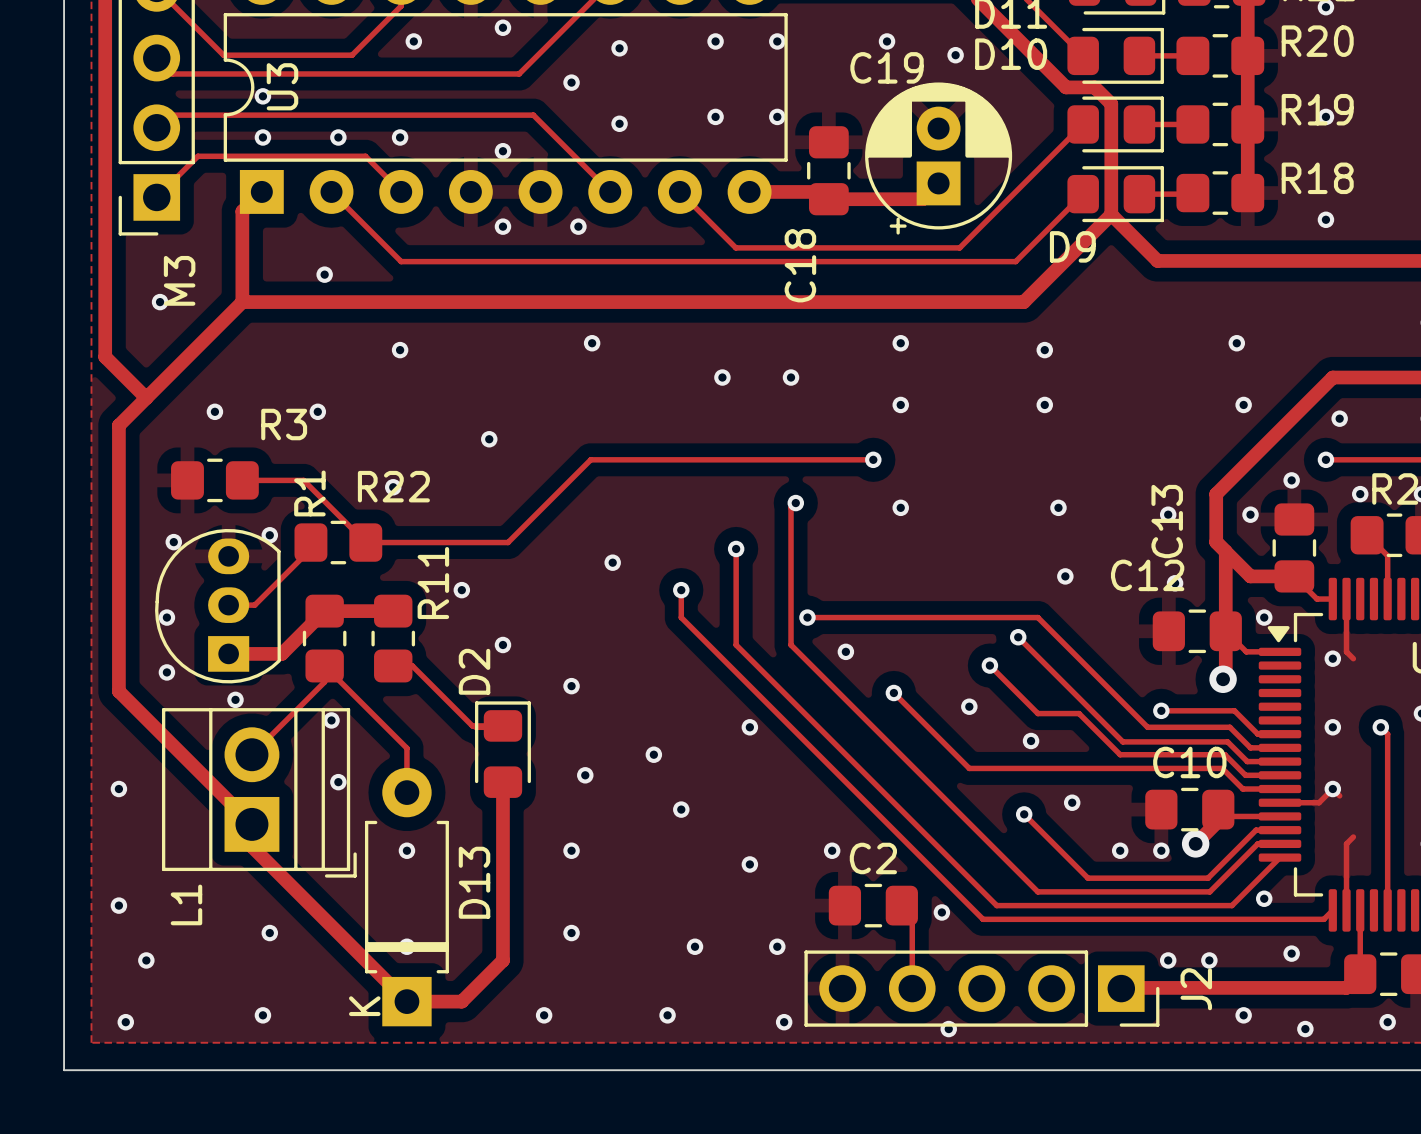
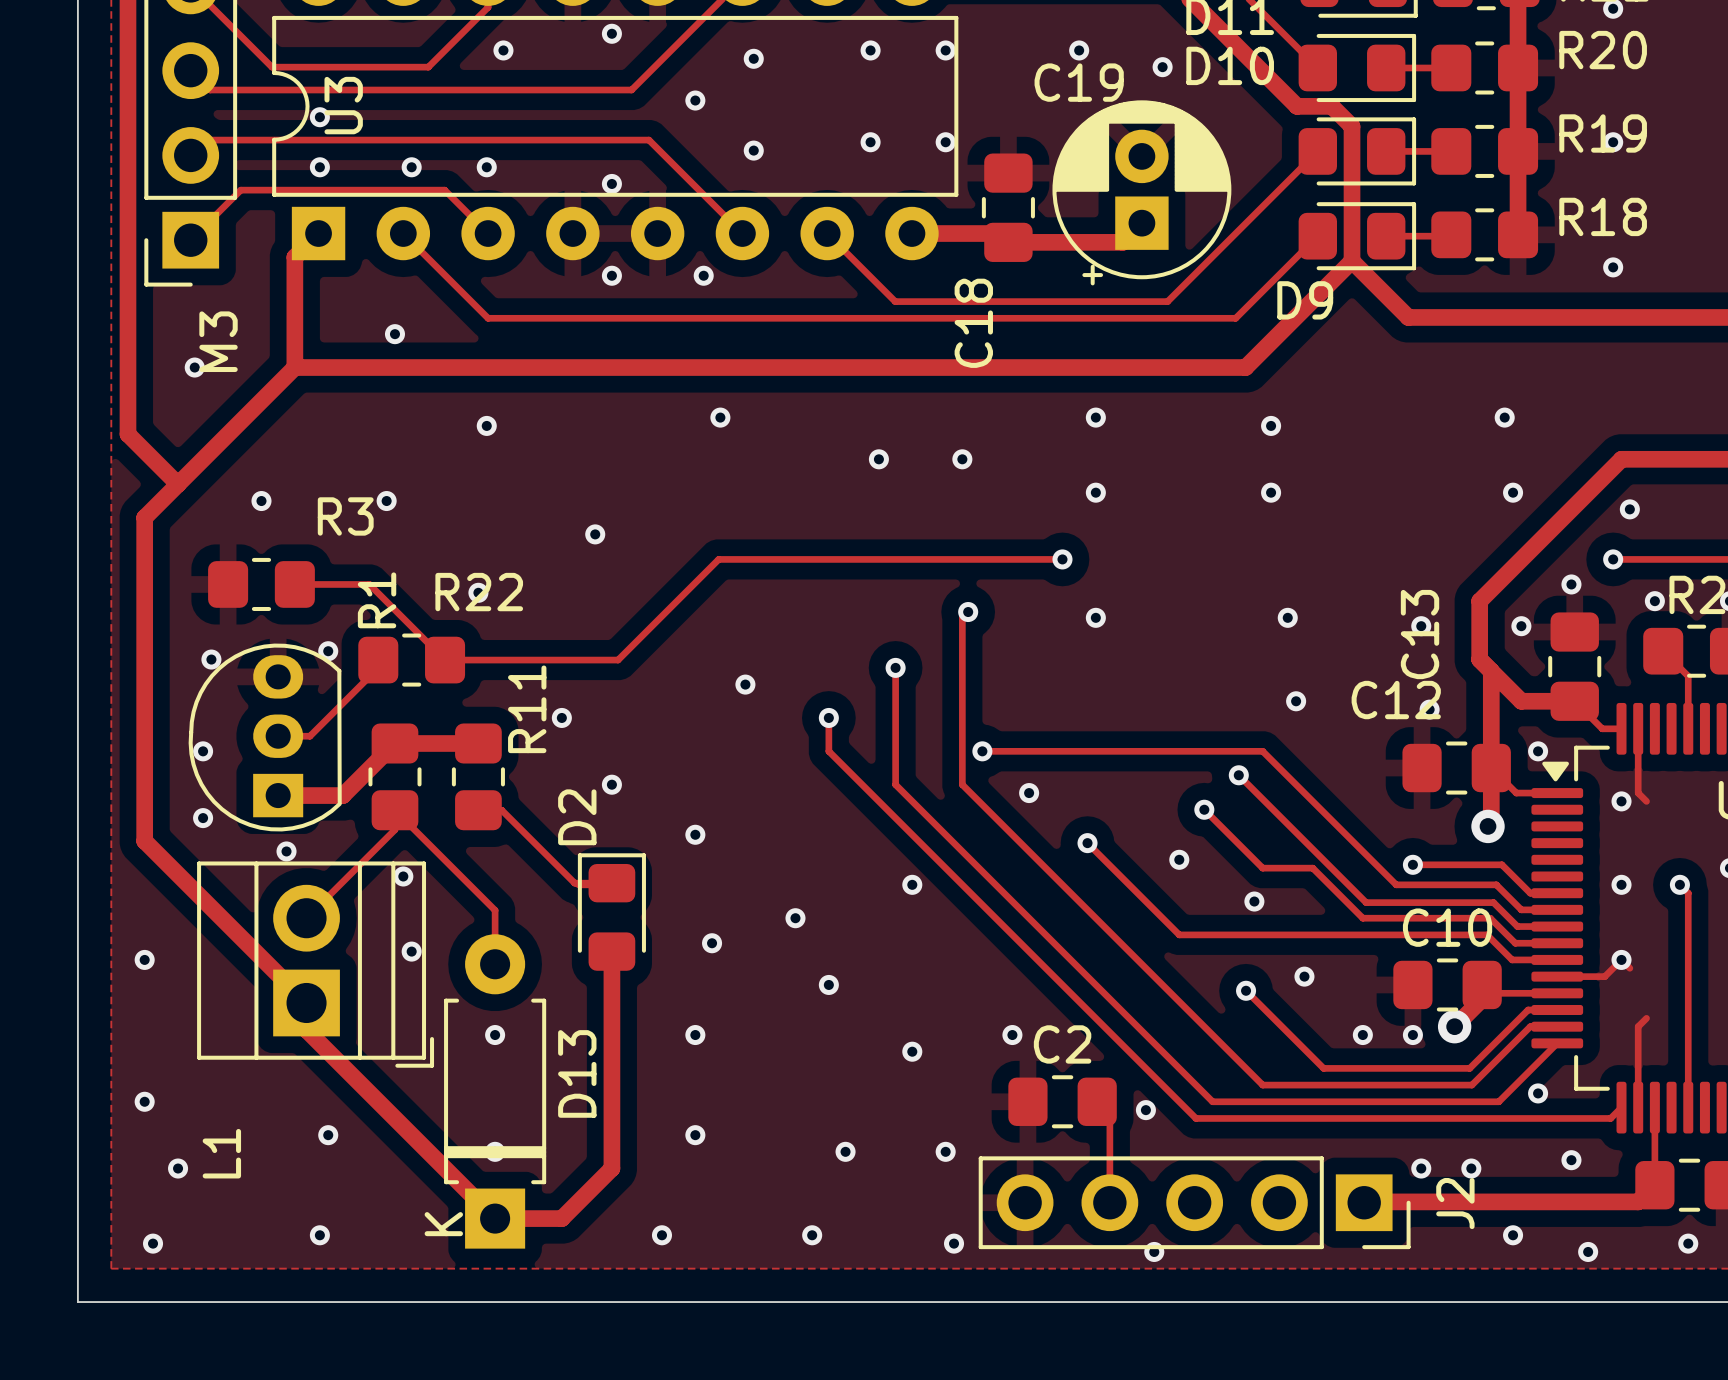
L1 name position: L1 (186, 904) -> L1 (221, 1153)

